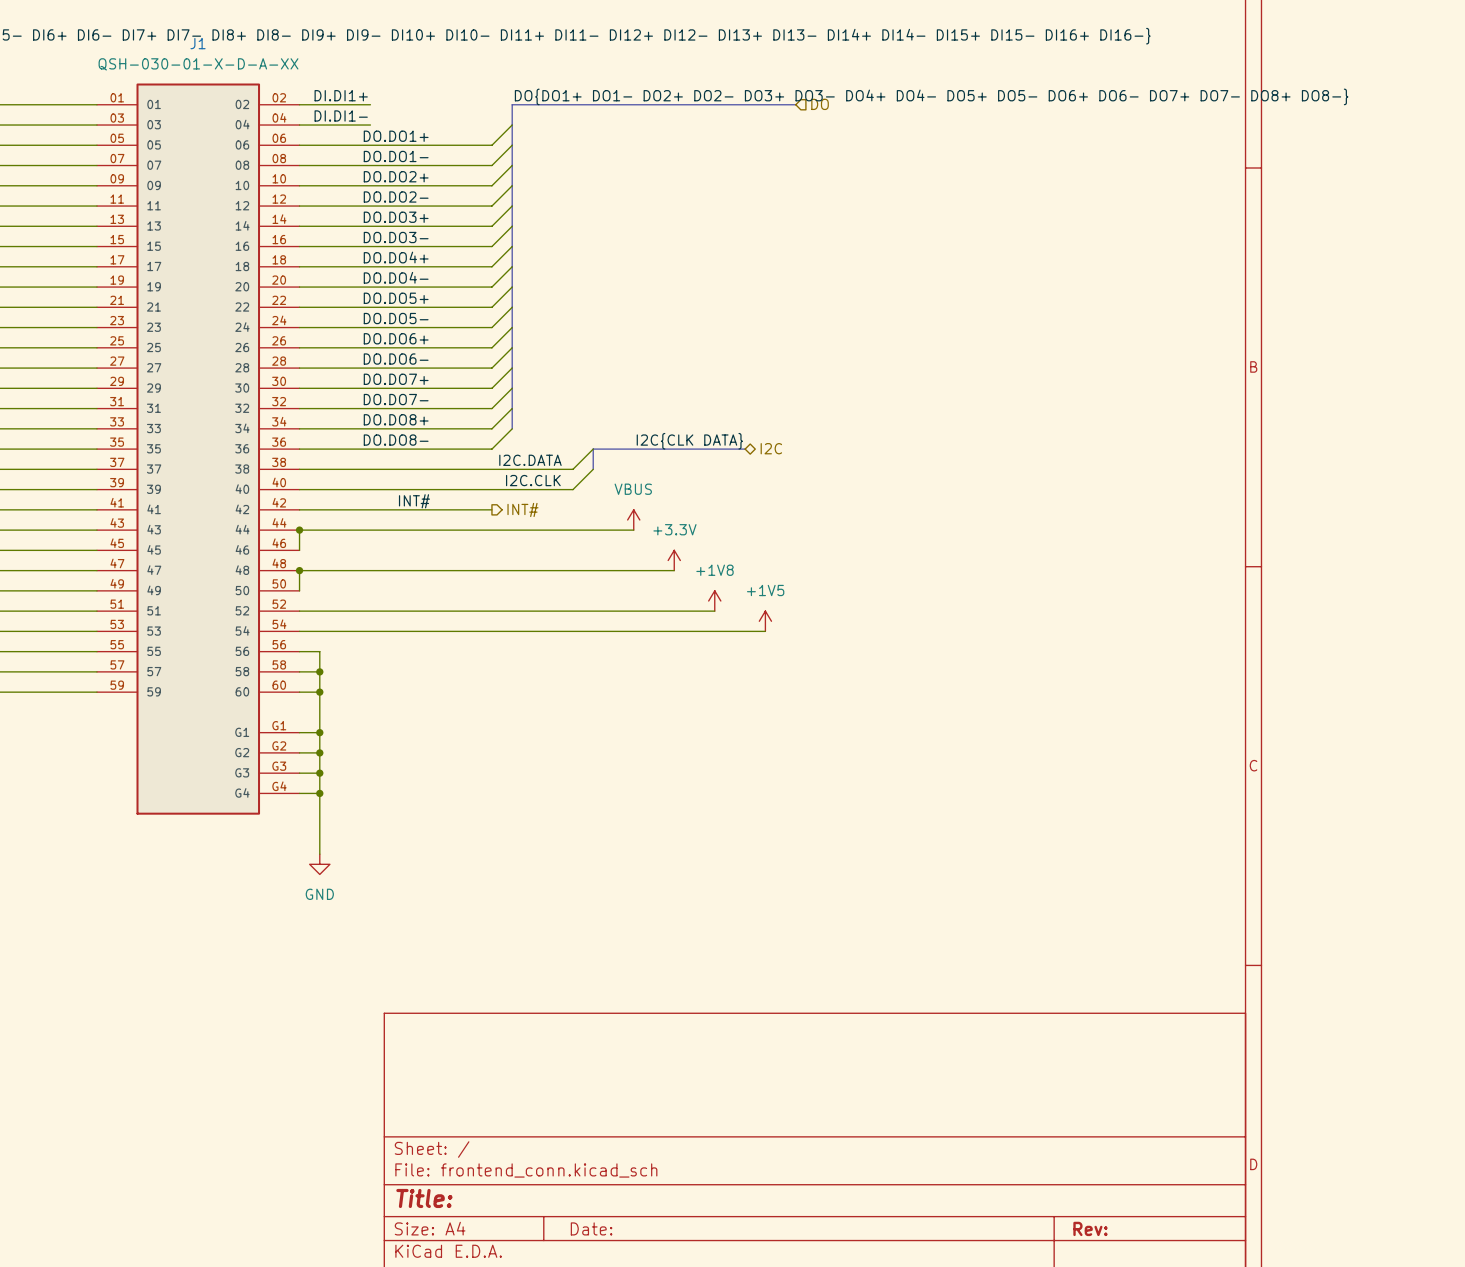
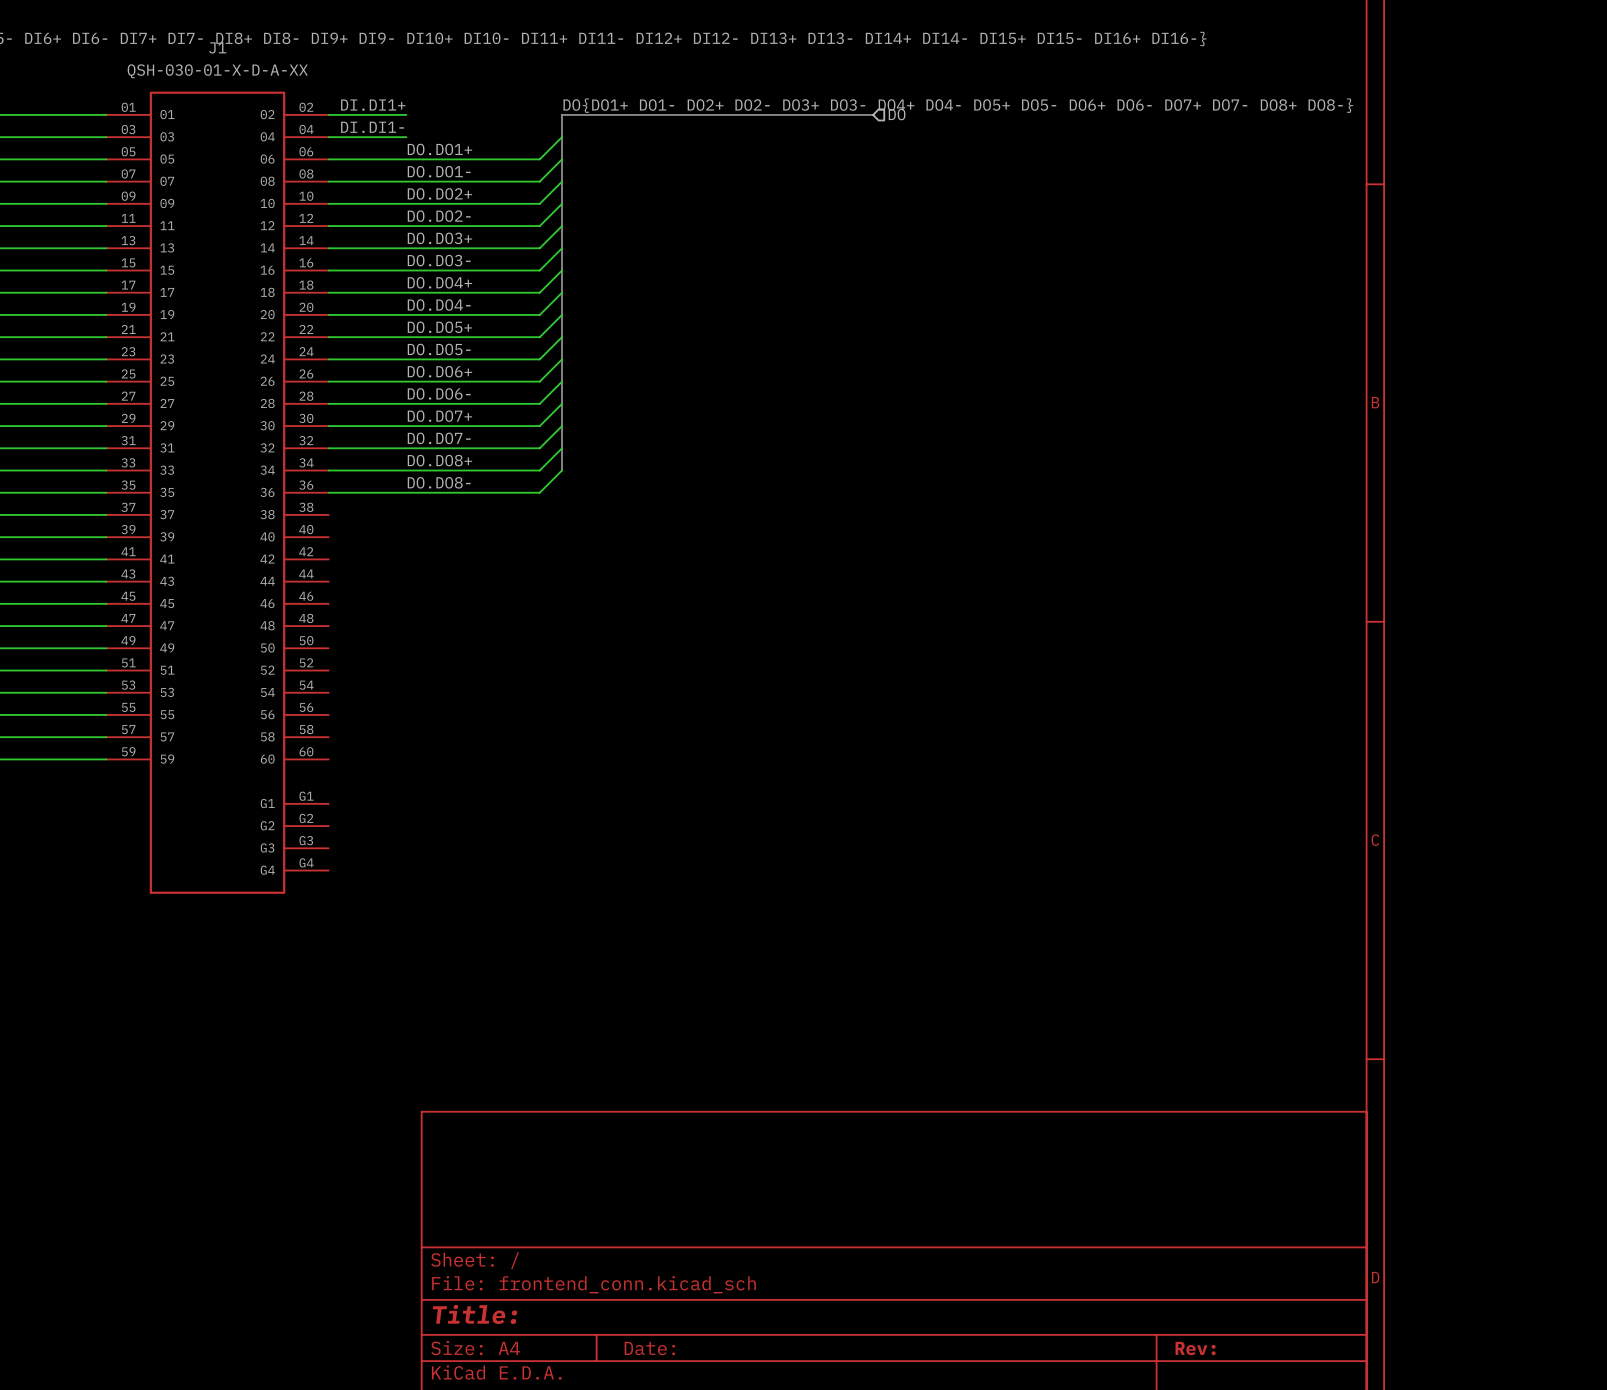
label: I2C{CLK DATA} (689, 441) -> none
hierarchical label: I2C (771, 448) -> none
wire: (593, 449) (572, 469) (299, 469) -> none
bus: (745, 449) (593, 449) (593, 469) -> none
label: I2C.DATA (530, 460) -> none
wire: (593, 469) (572, 489) (299, 489) -> none
label: I2C.CLK (533, 480) -> none
label: INT# (414, 501) -> none
wire: (299, 509) (491, 509) -> none
hierarchical label: INT# (522, 509) -> none
power symbol: VBUS (633, 519) -> none
junction: (299, 530) -> none
wire: (633, 530) (299, 530) (299, 550) -> none
power symbol: +3.3V (674, 560) -> none
junction: (299, 570) -> none
wire: (674, 570) (299, 570) (299, 590) -> none
power symbol: +1V8 (714, 601) -> none
wire: (299, 611) (714, 611) -> none
power symbol: +1V5 (765, 621) -> none
wire: (299, 631) (765, 631) -> none
wire: (299, 651) (319, 651) (319, 854) -> none
wire: (299, 671) (319, 671) -> none
junction: (319, 671) -> none
wire: (299, 692) (319, 692) -> none
junction: (319, 692) -> none
wire: (299, 732) (319, 732) -> none
junction: (319, 732) -> none
wire: (299, 752) (319, 752) -> none
junction: (319, 752) -> none
wire: (299, 773) (319, 773) -> none
junction: (319, 773) -> none
wire: (299, 793) (319, 793) -> none
junction: (319, 793) -> none
power symbol: GND (319, 864) -> none

